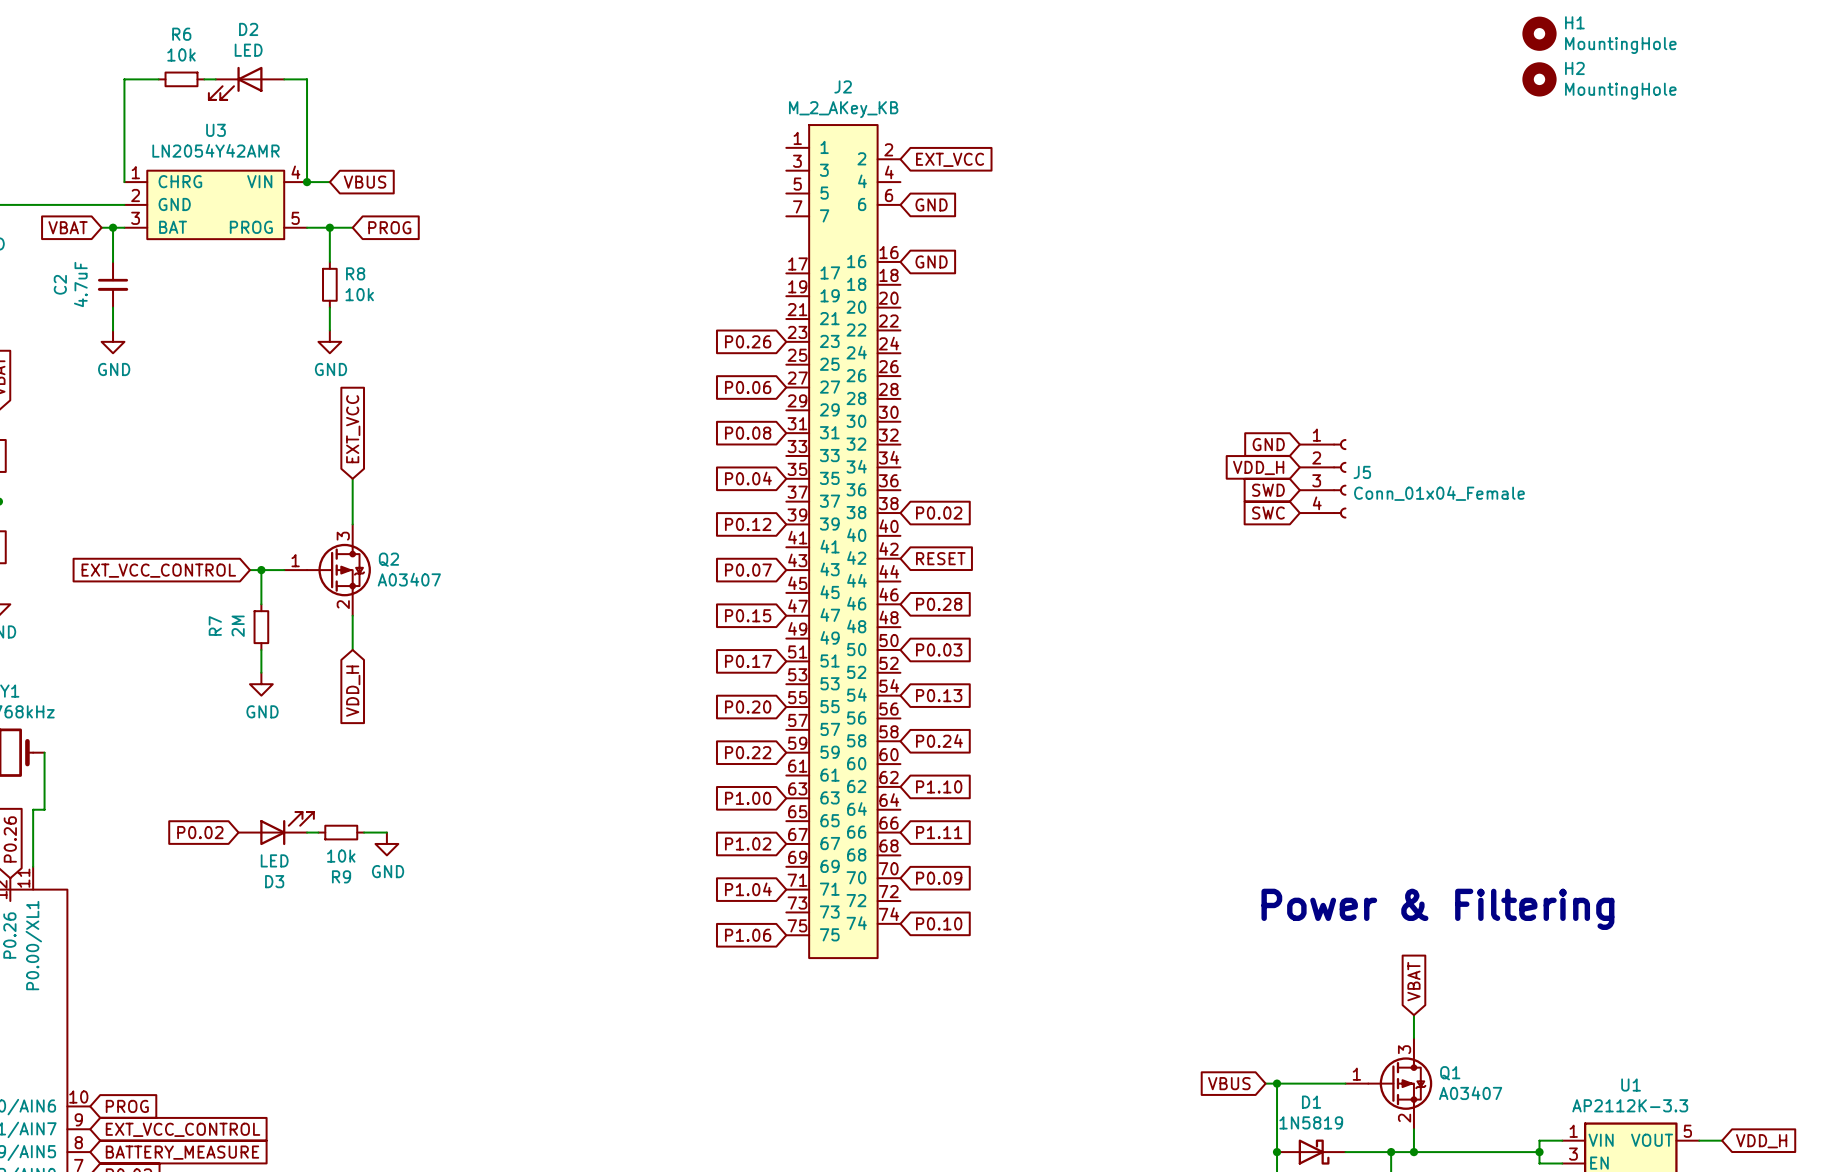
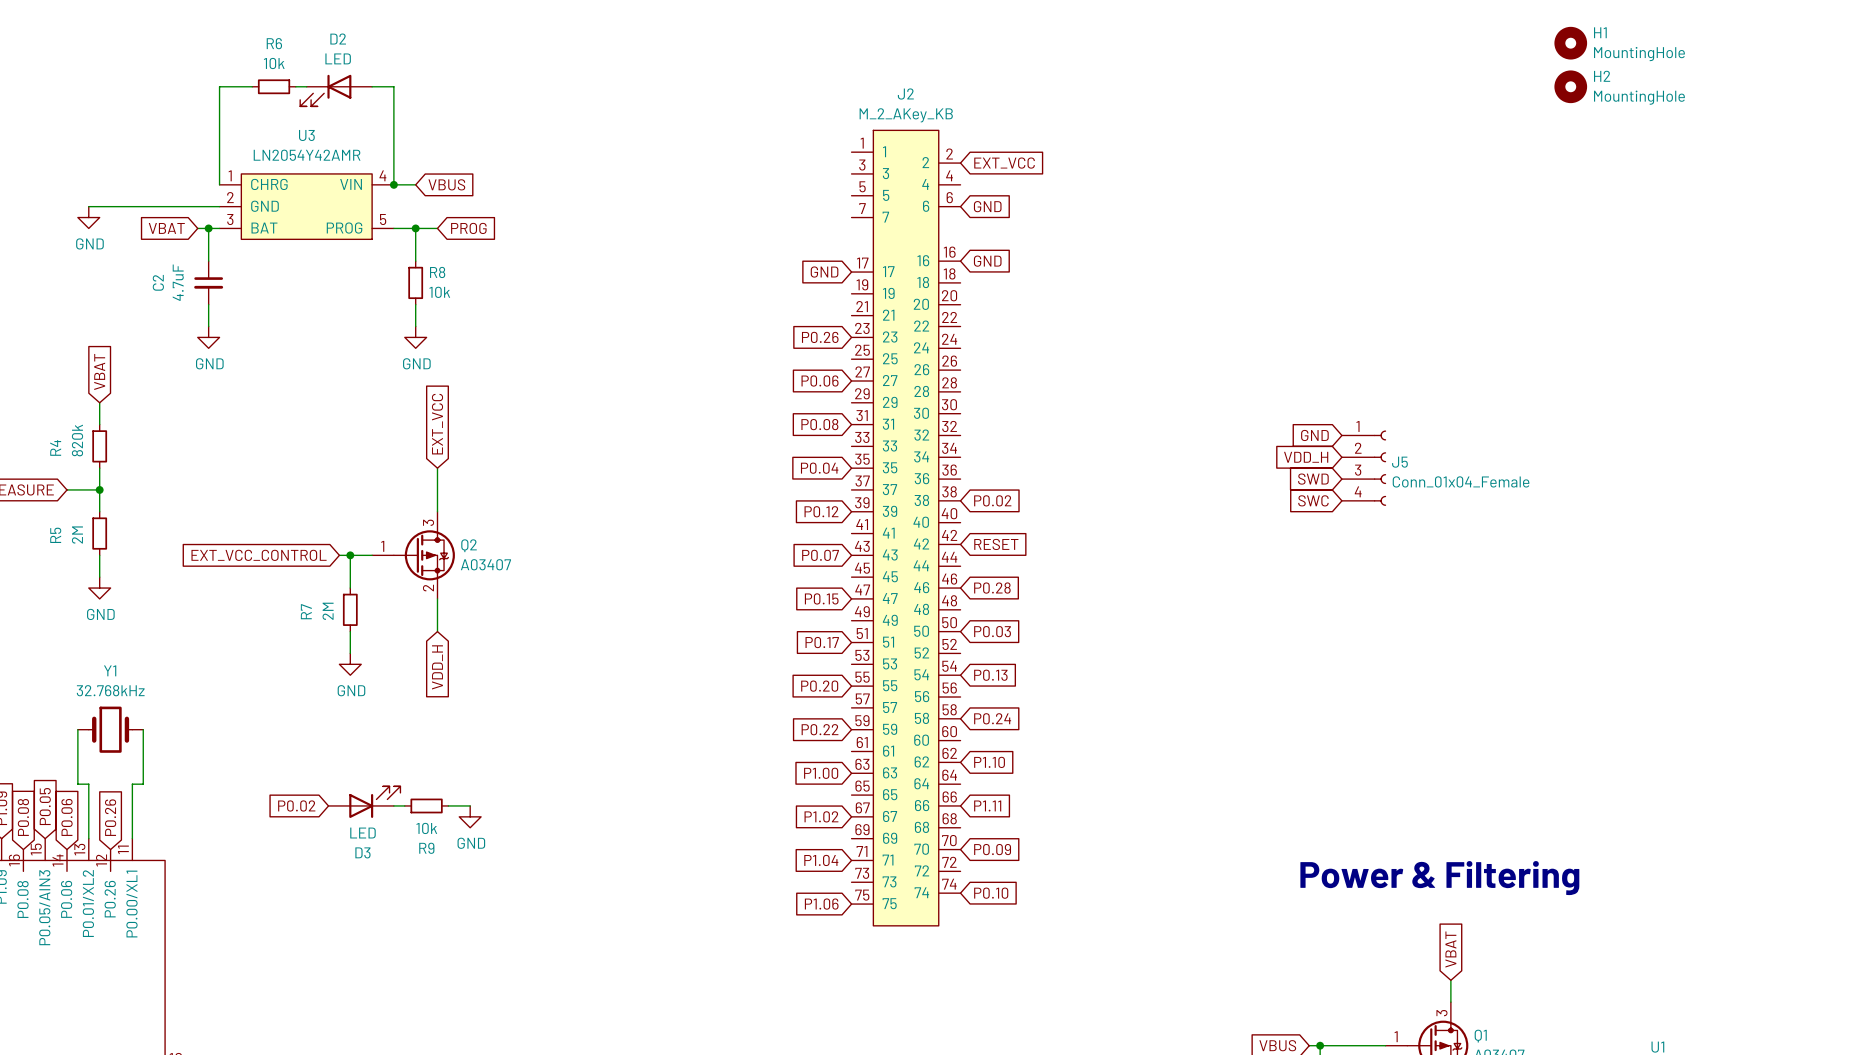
global label: none -> GND (824, 272)

